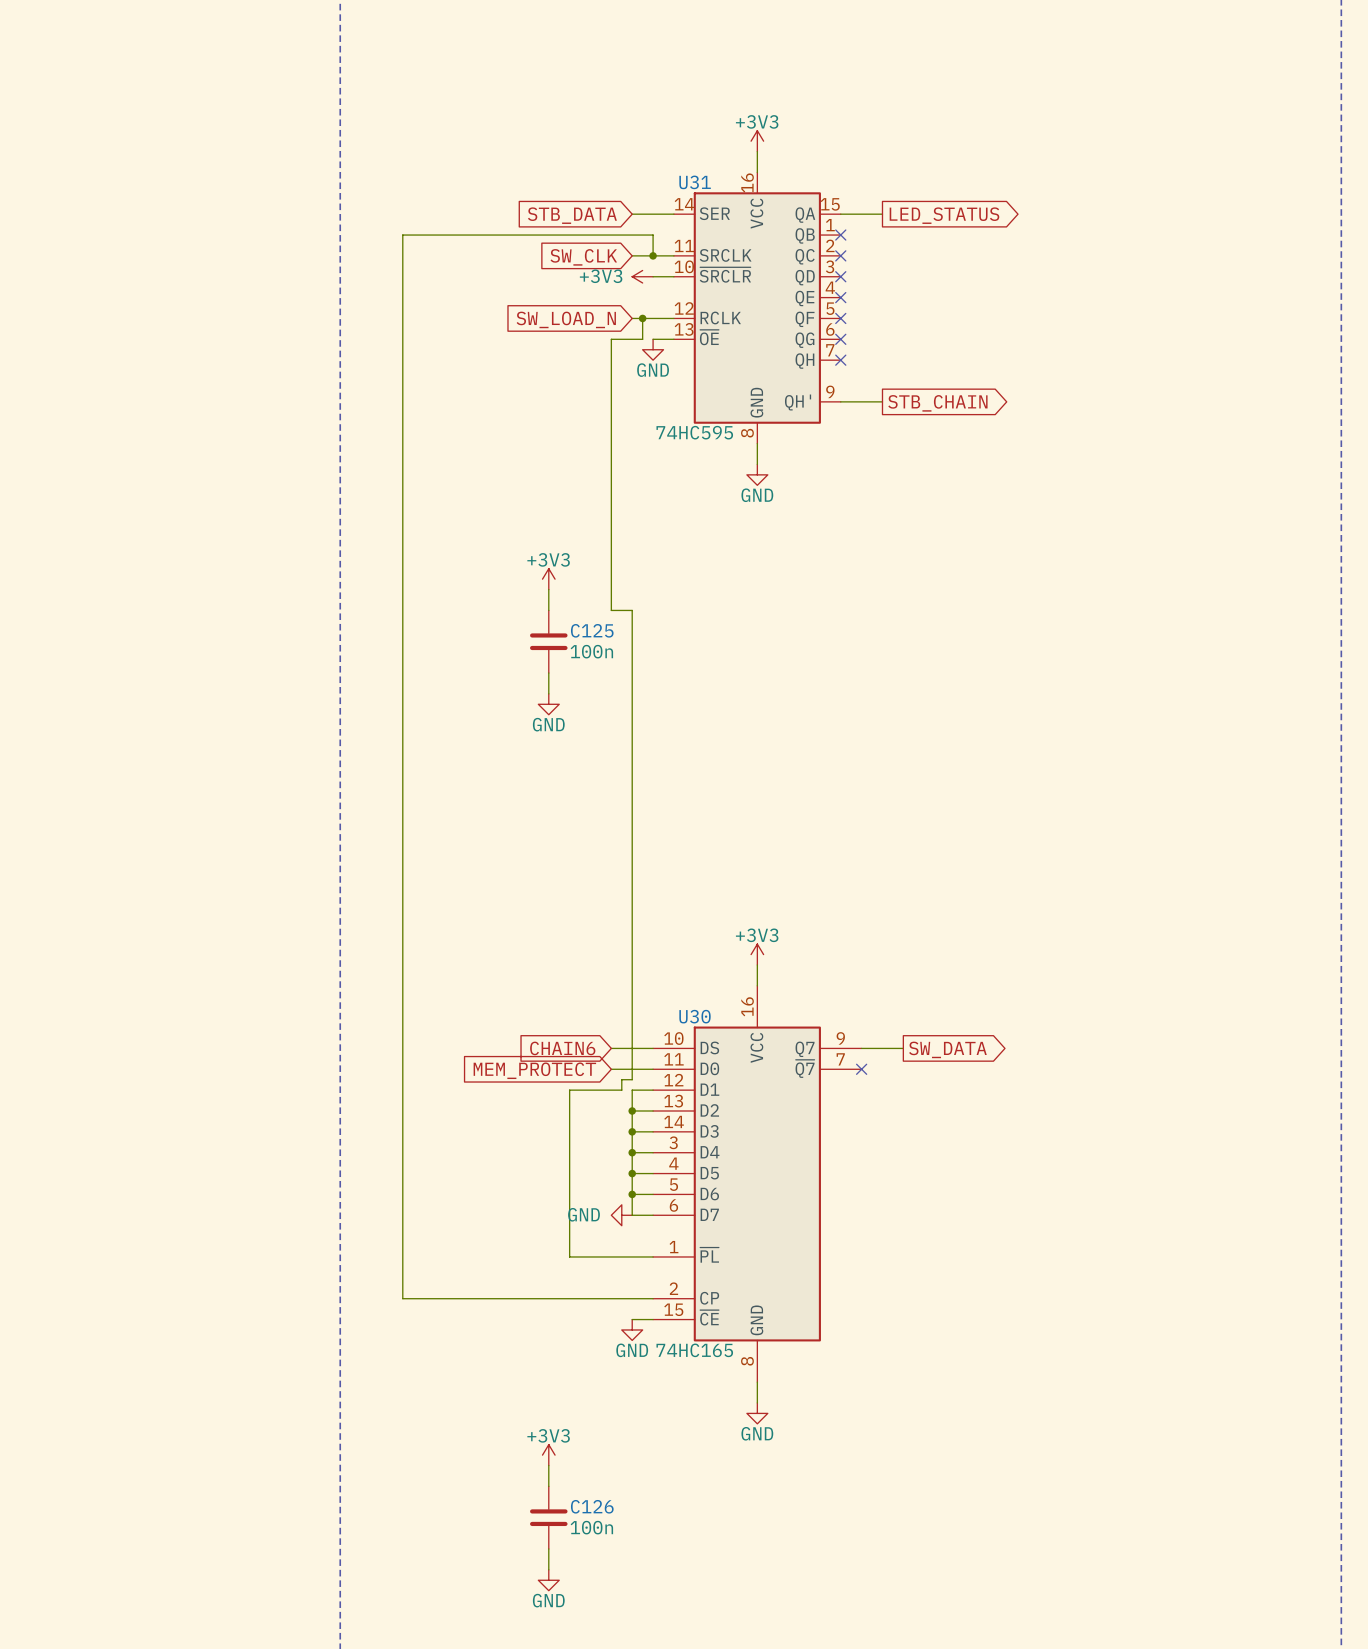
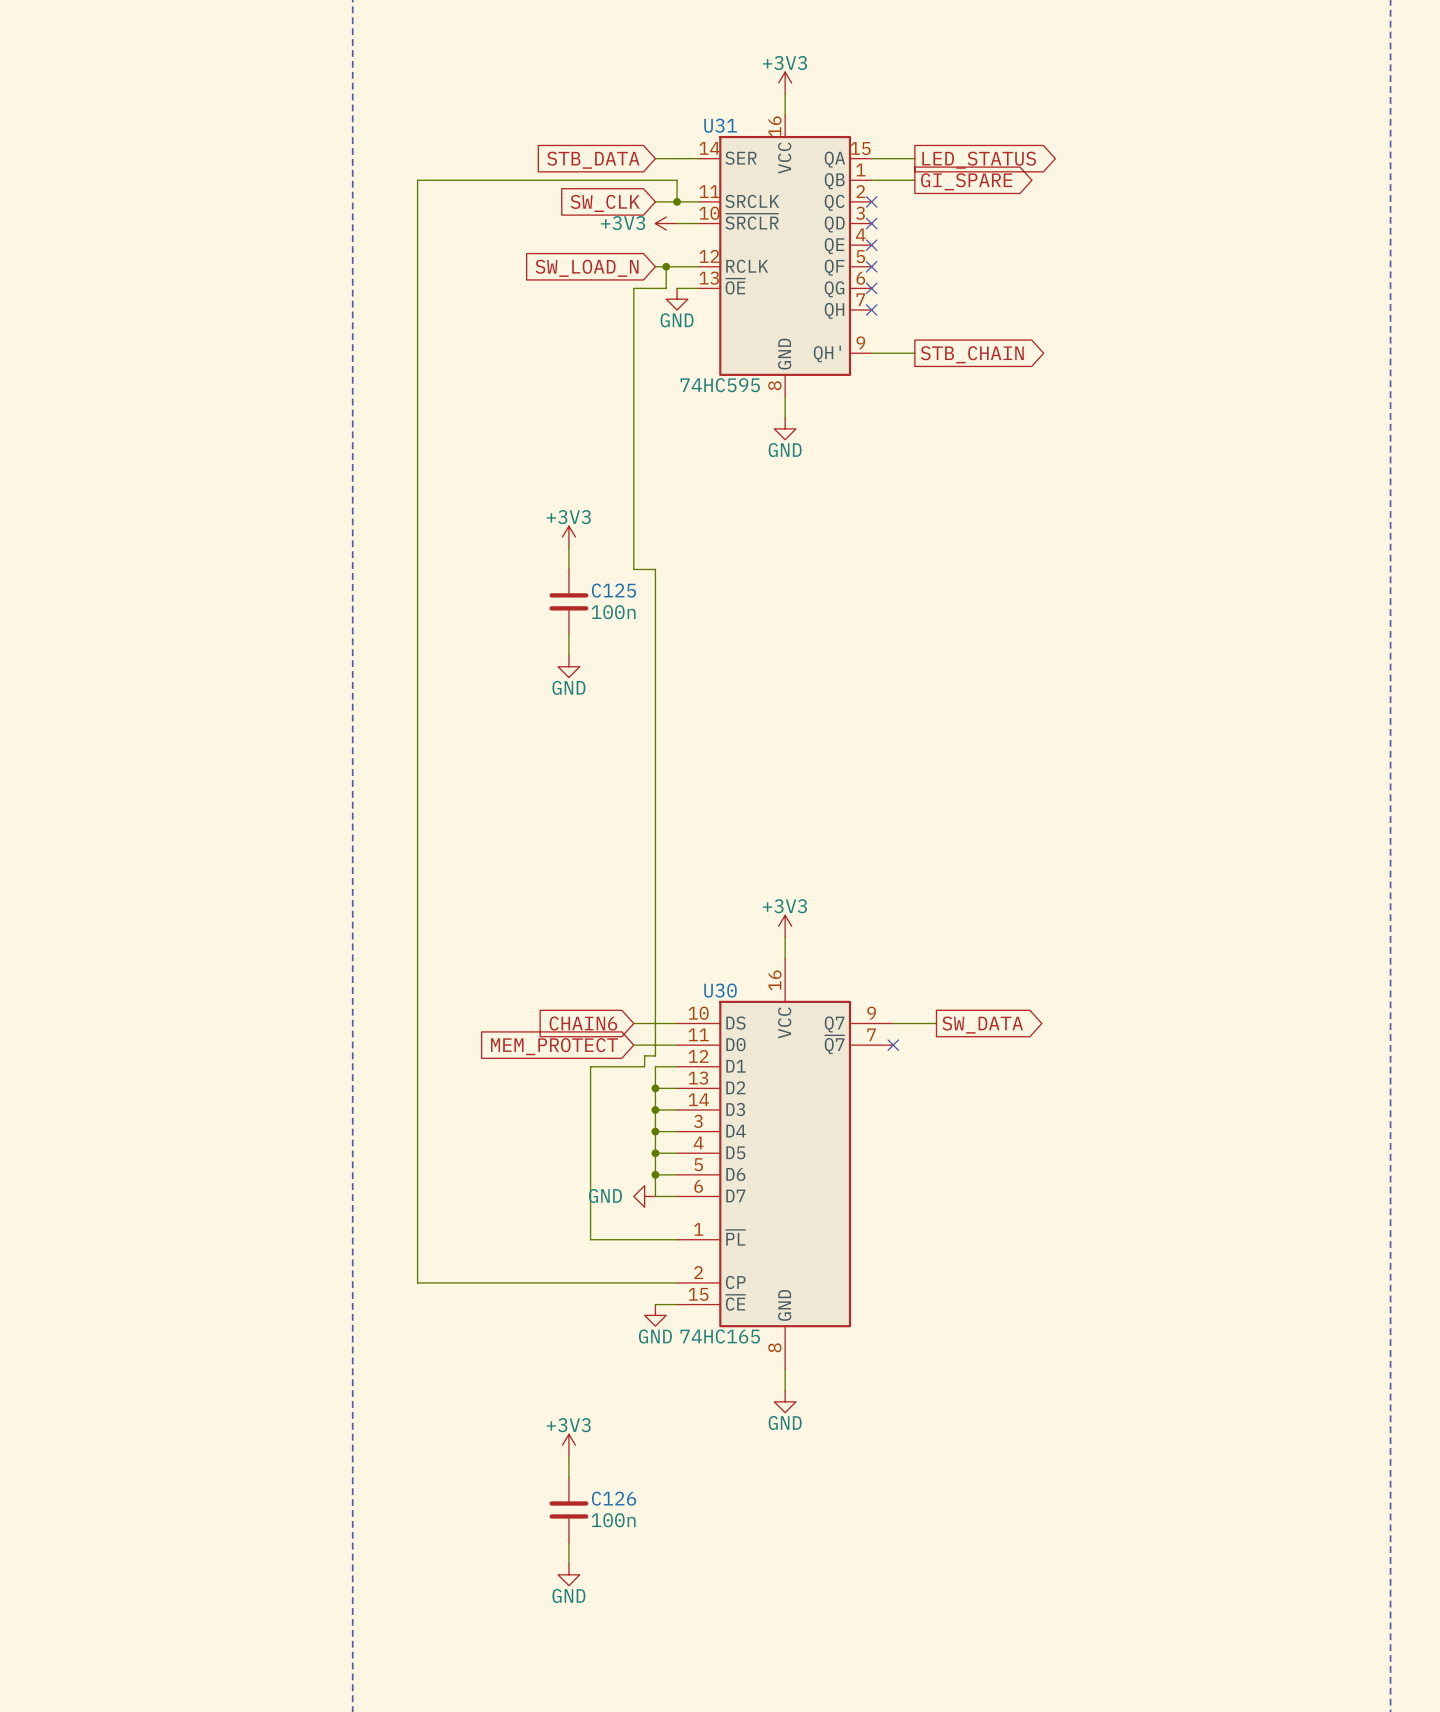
wire: none -> (871, 180) (914, 180)
no-connect mark: (840, 235) -> none
global label: none -> GI_SPARE (966, 181)

